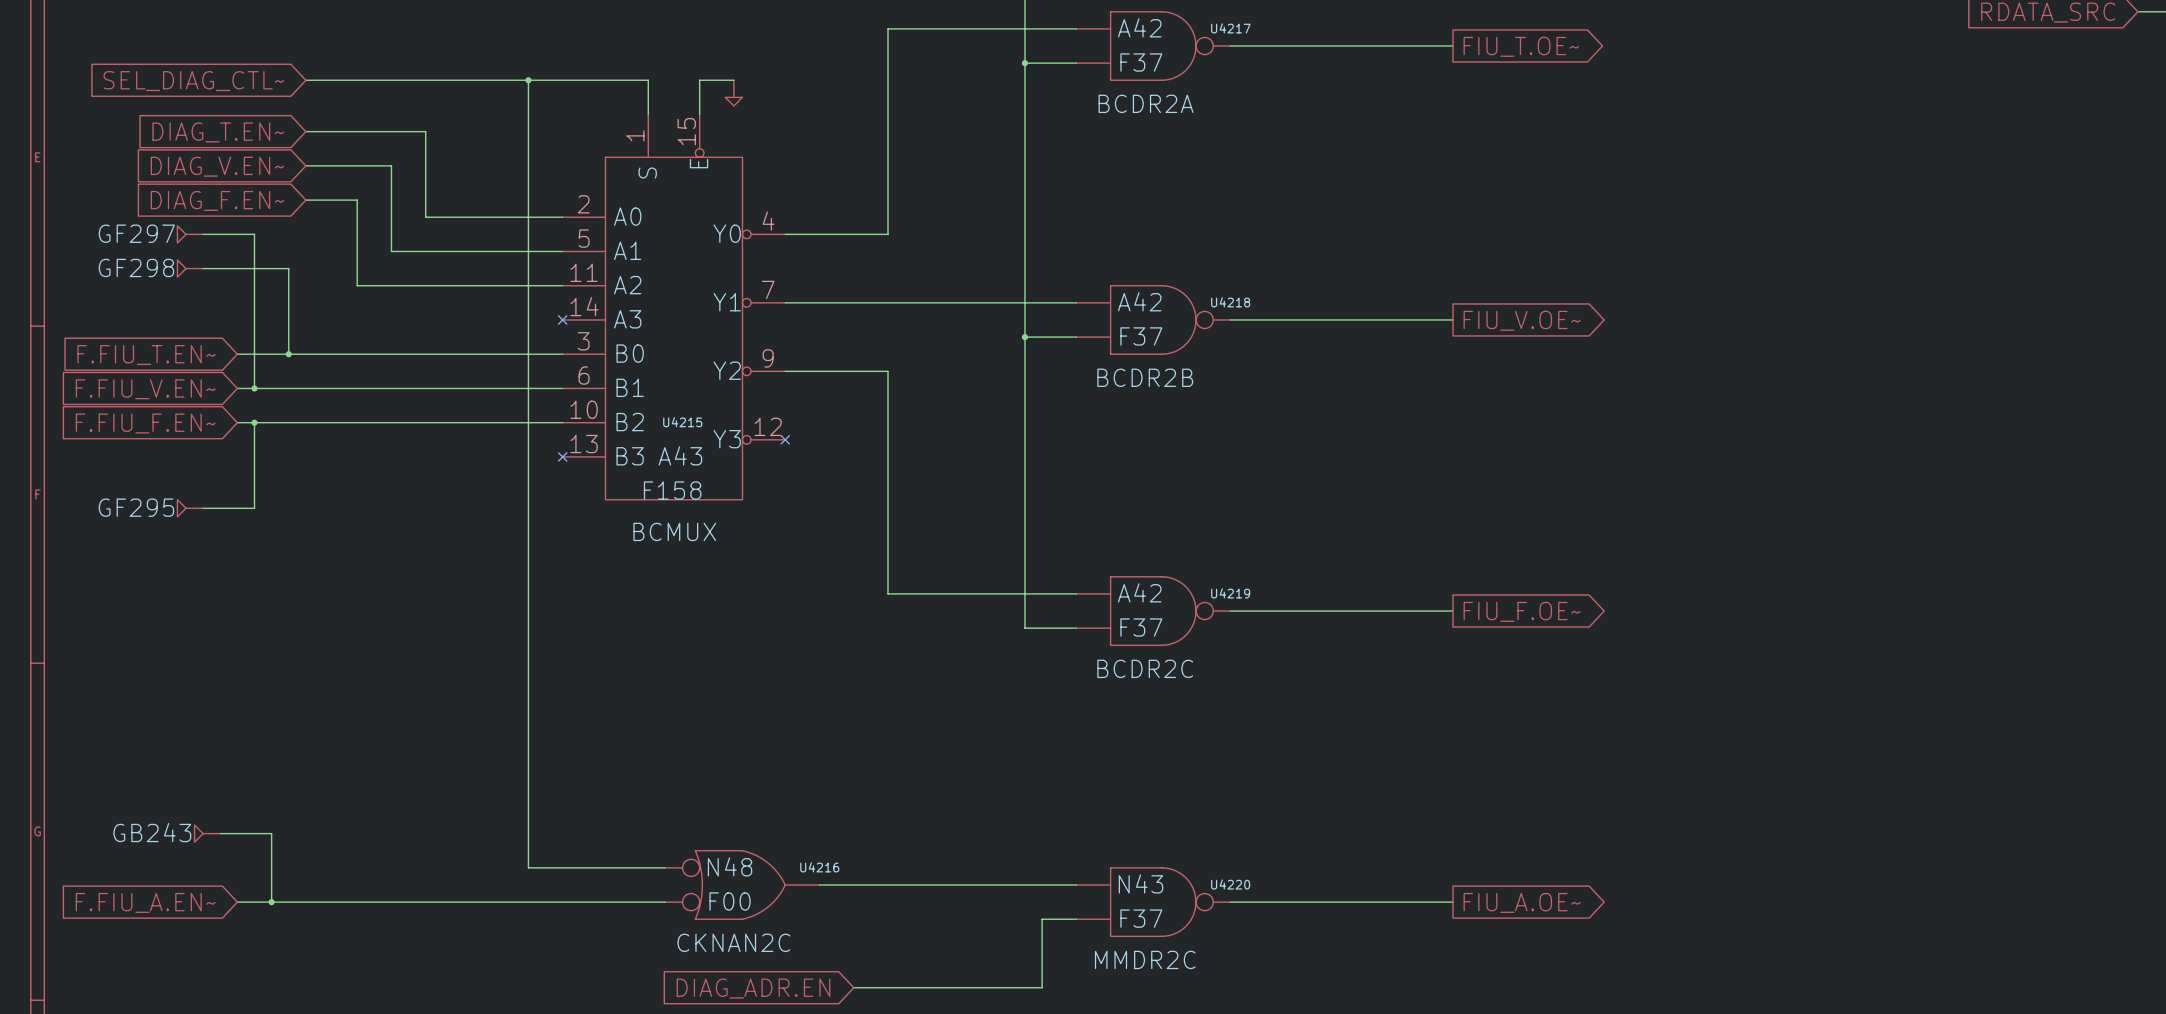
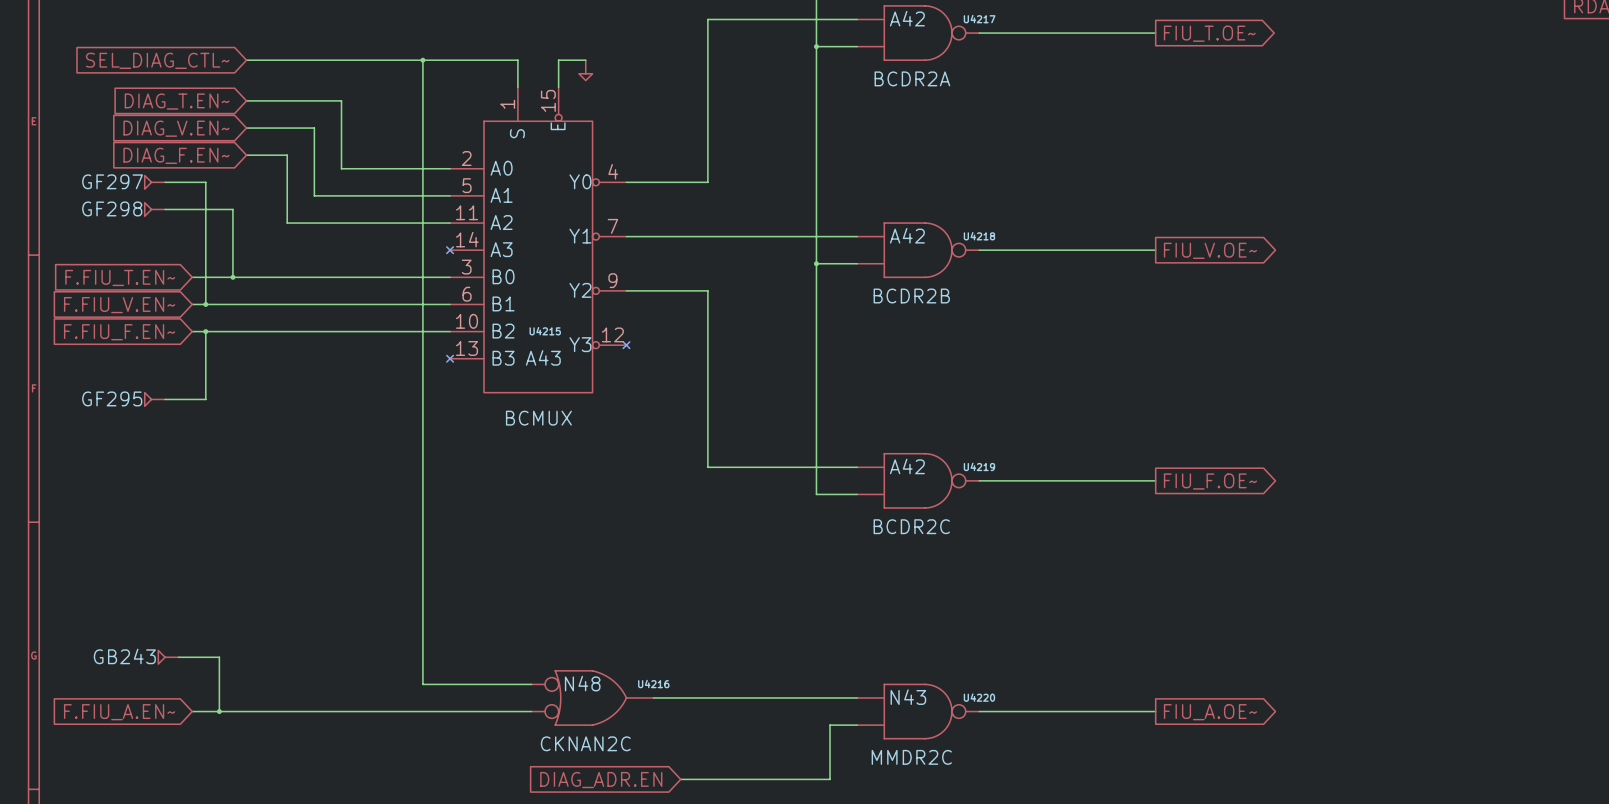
U4217 value: F37 (1141, 62) -> none
U4218 value: F37 (1141, 336) -> none
U4215 value: F158 (672, 490) -> none
U4219 value: F37 (1141, 627) -> none
U4216 value: F00 (730, 901) -> none
U4220 value: F37 (1141, 918) -> none

